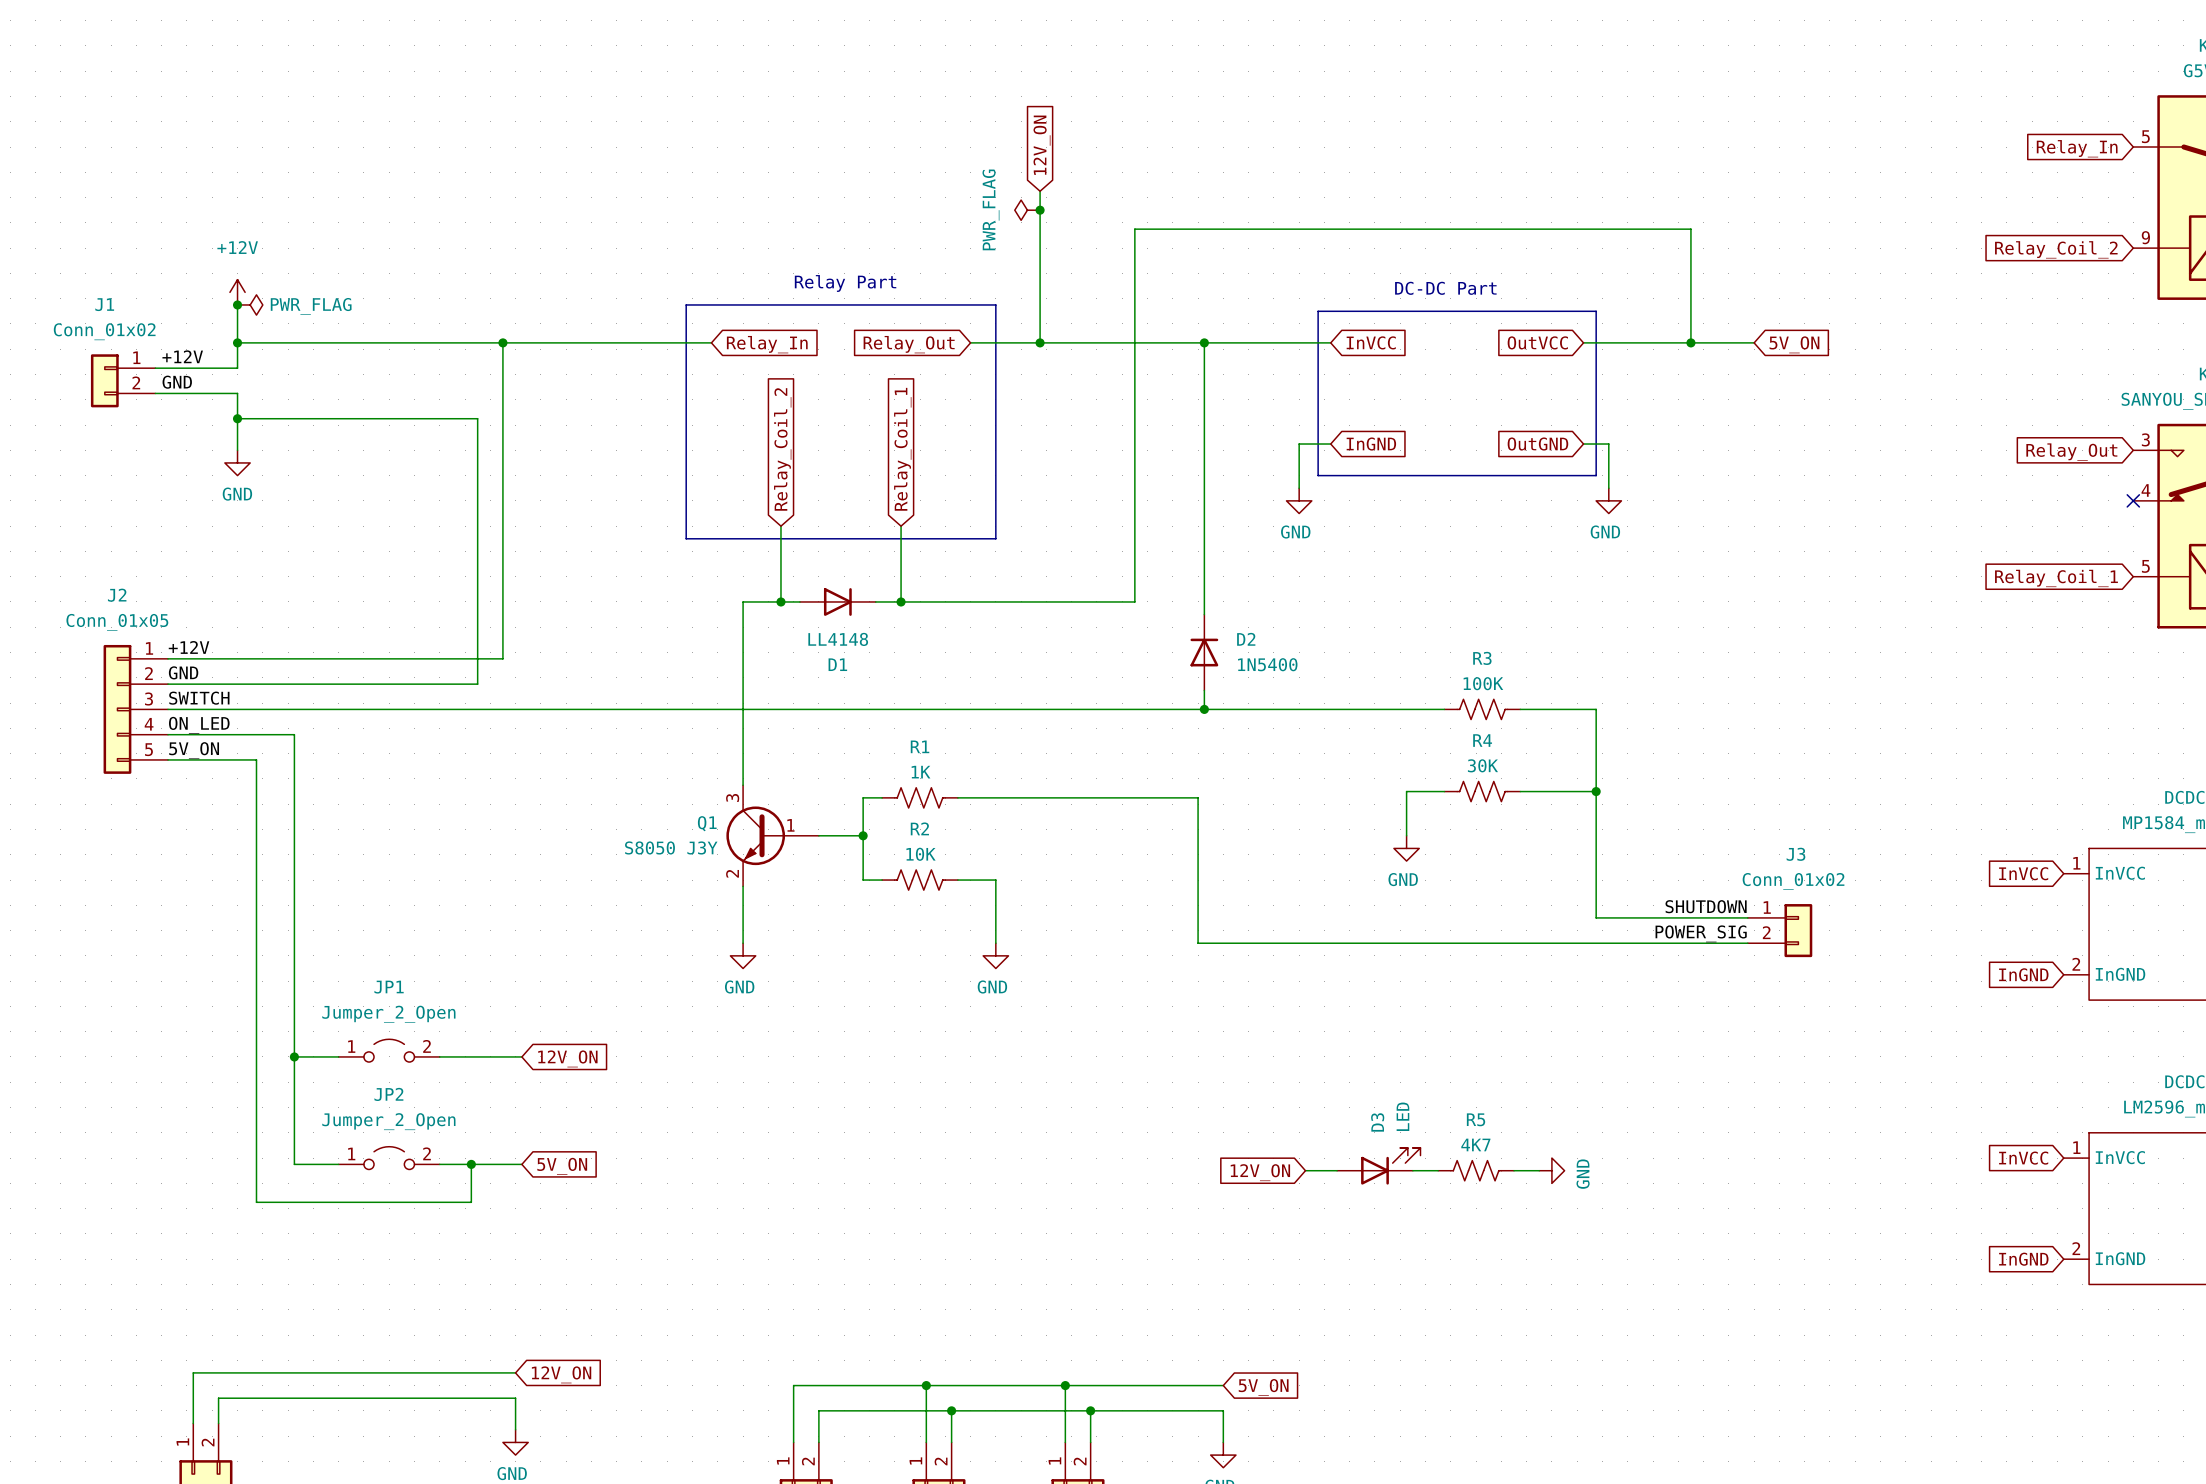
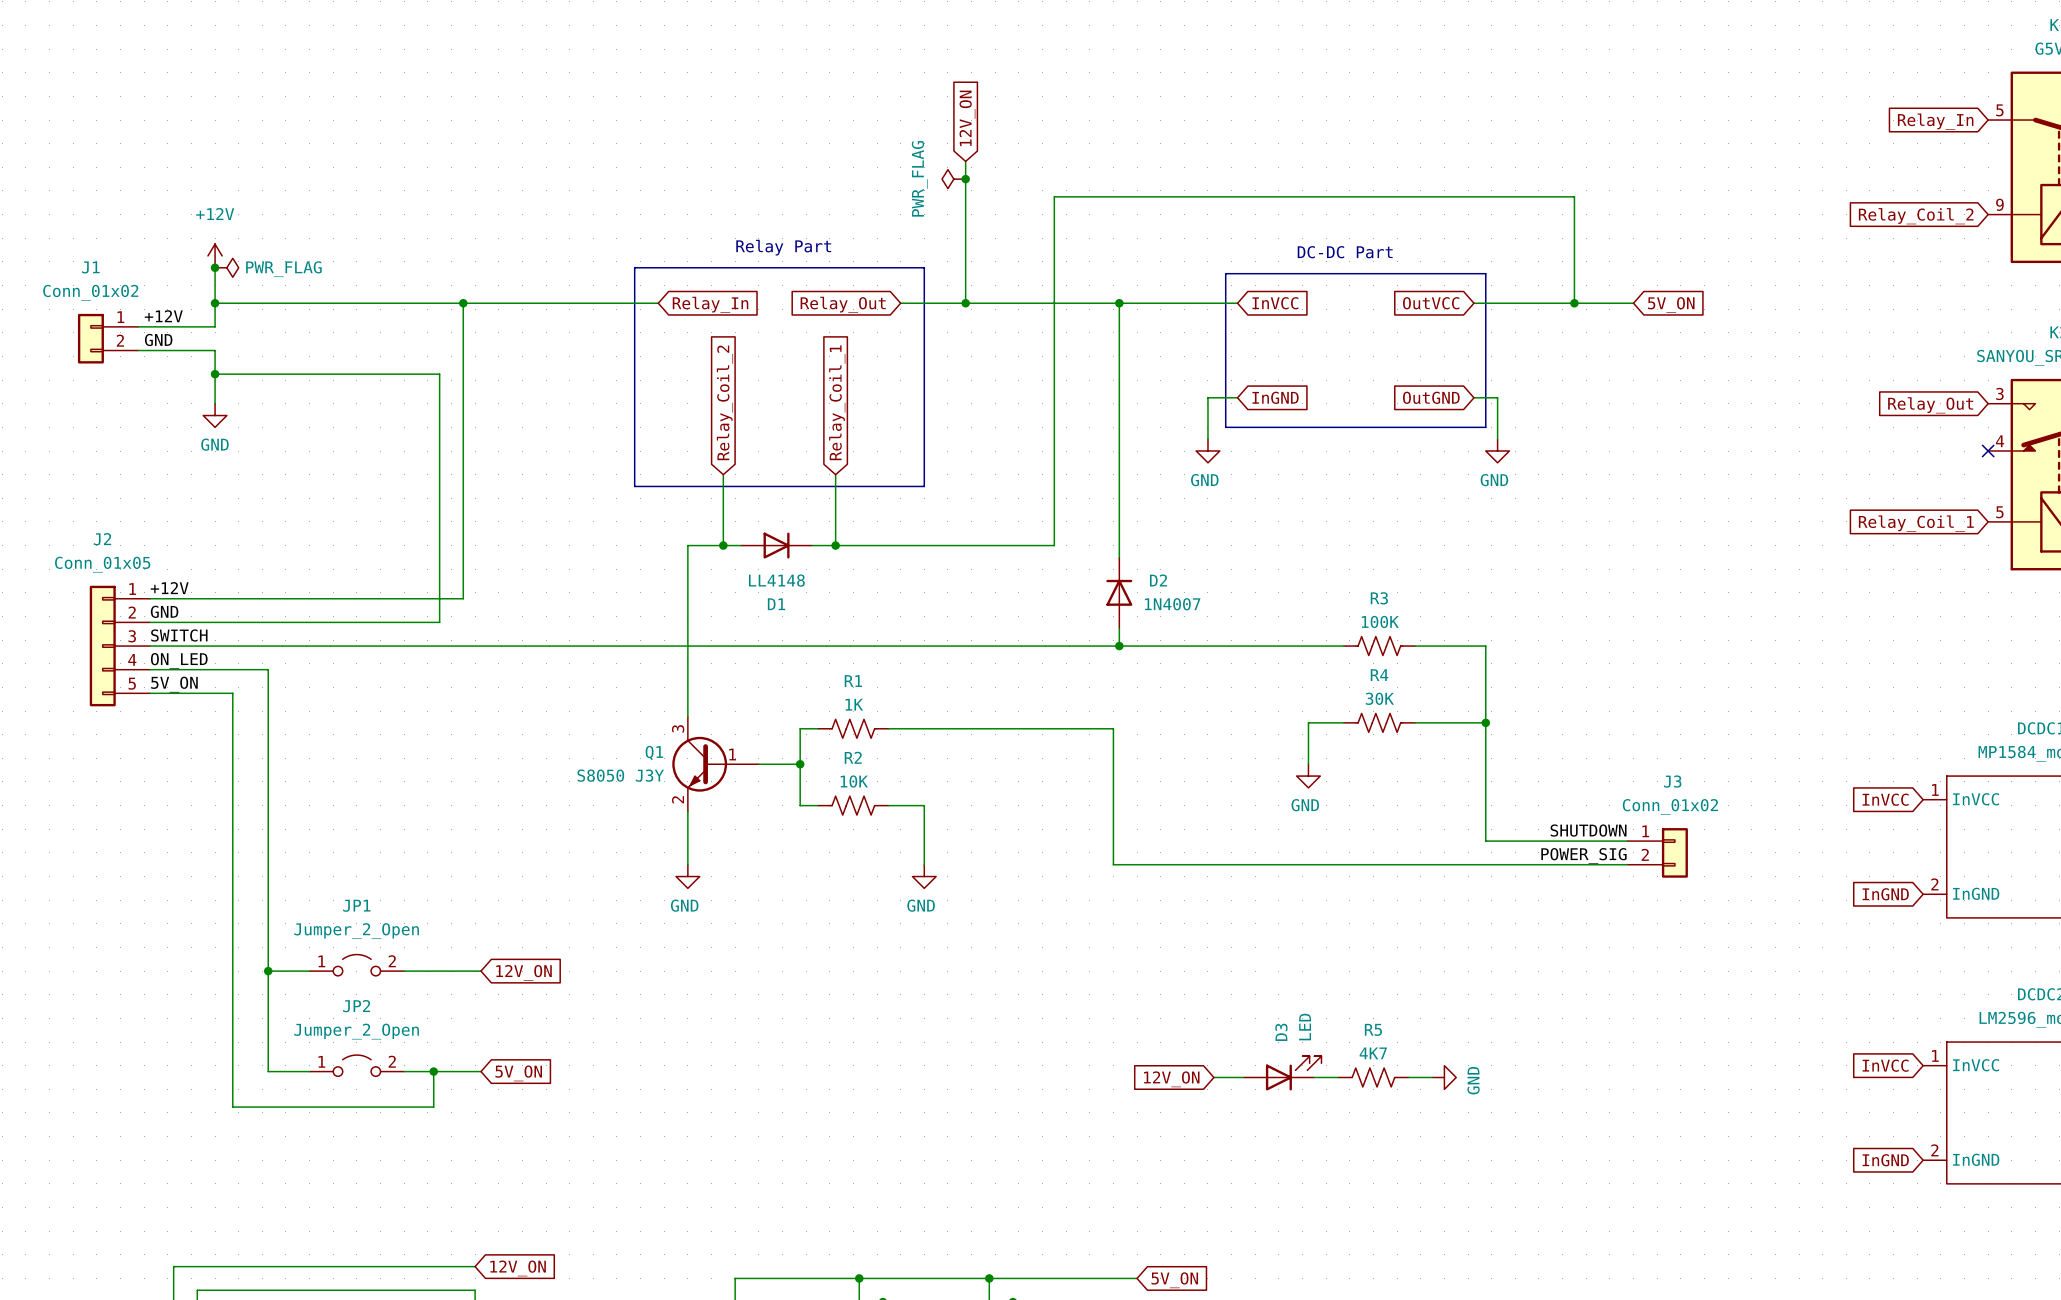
D2 value: 1N5400 (1267, 664) -> 1N4007 (1172, 604)

